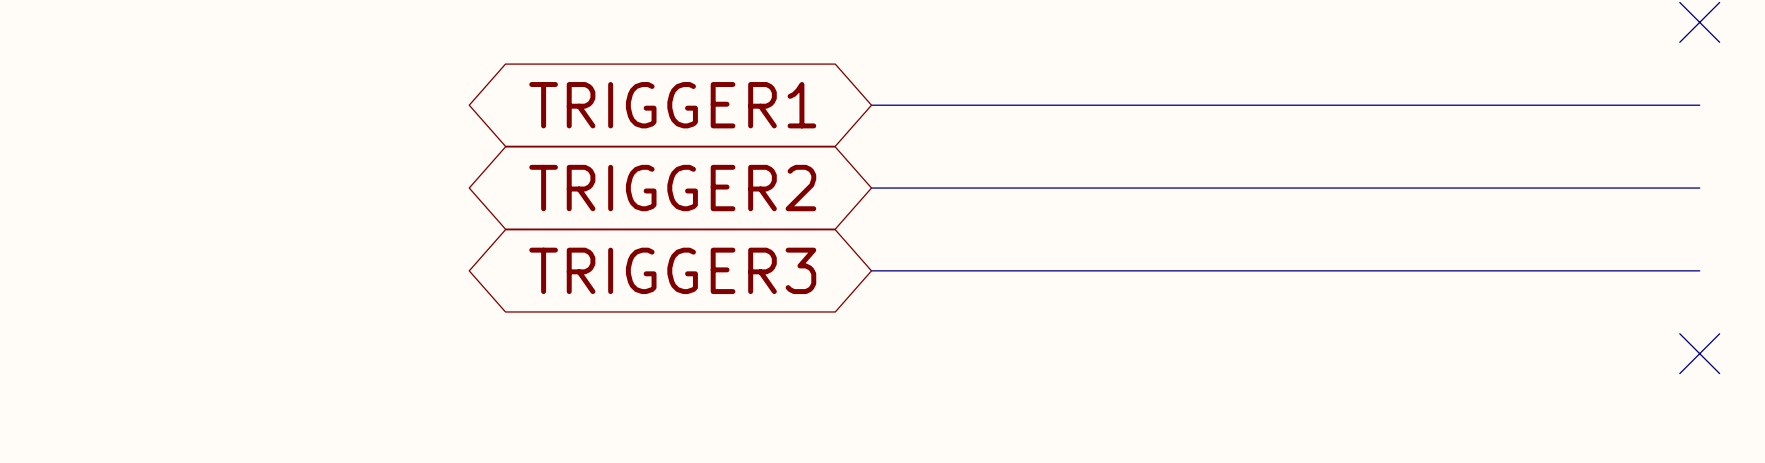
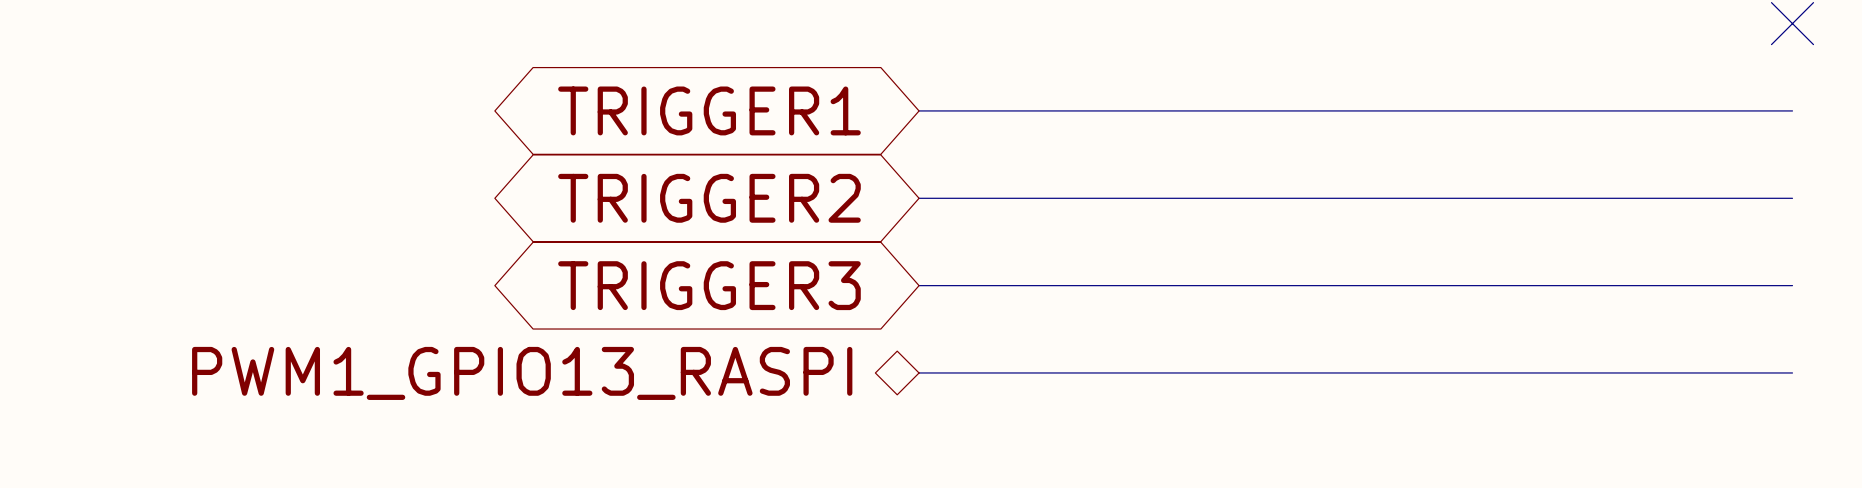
wire: none -> (919, 372) (1792, 372)
no-connect mark: (1699, 353) -> none
hierarchical label: none -> PWM1_GPIO13_RASPI (522, 373)

